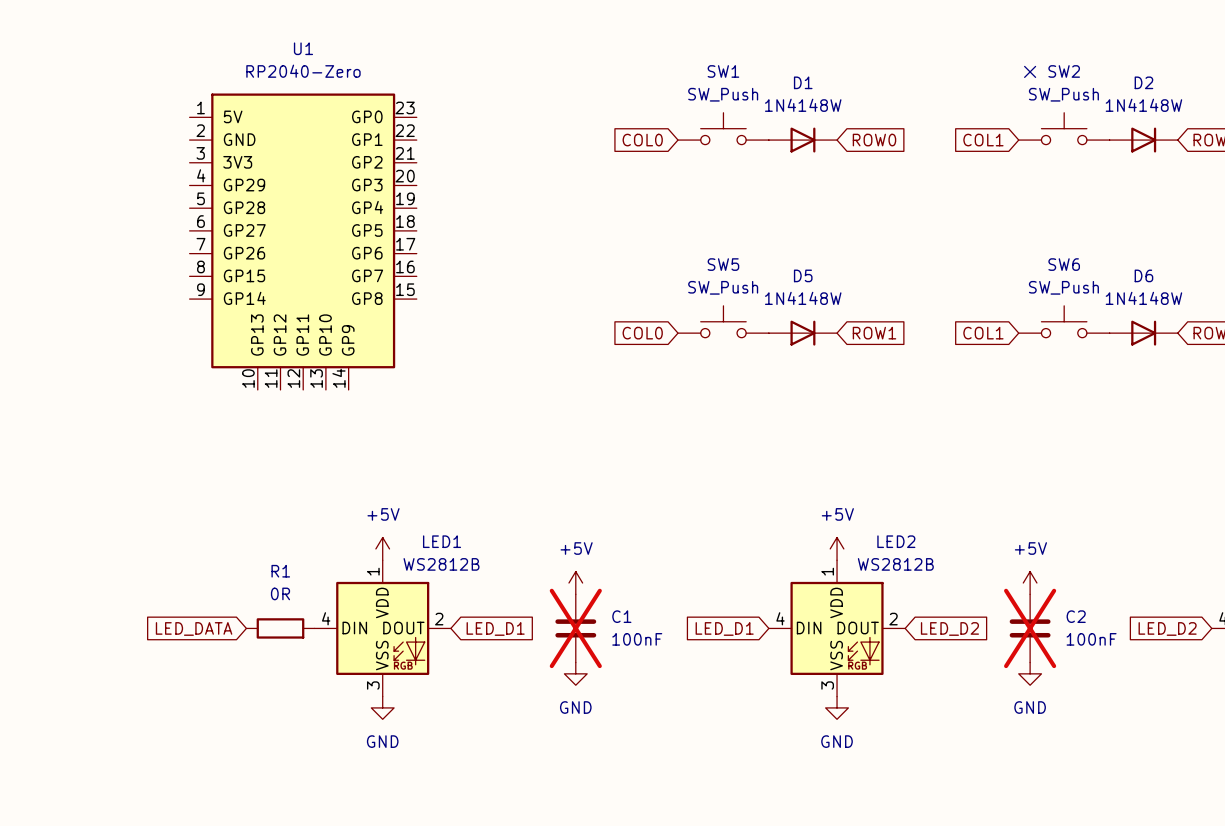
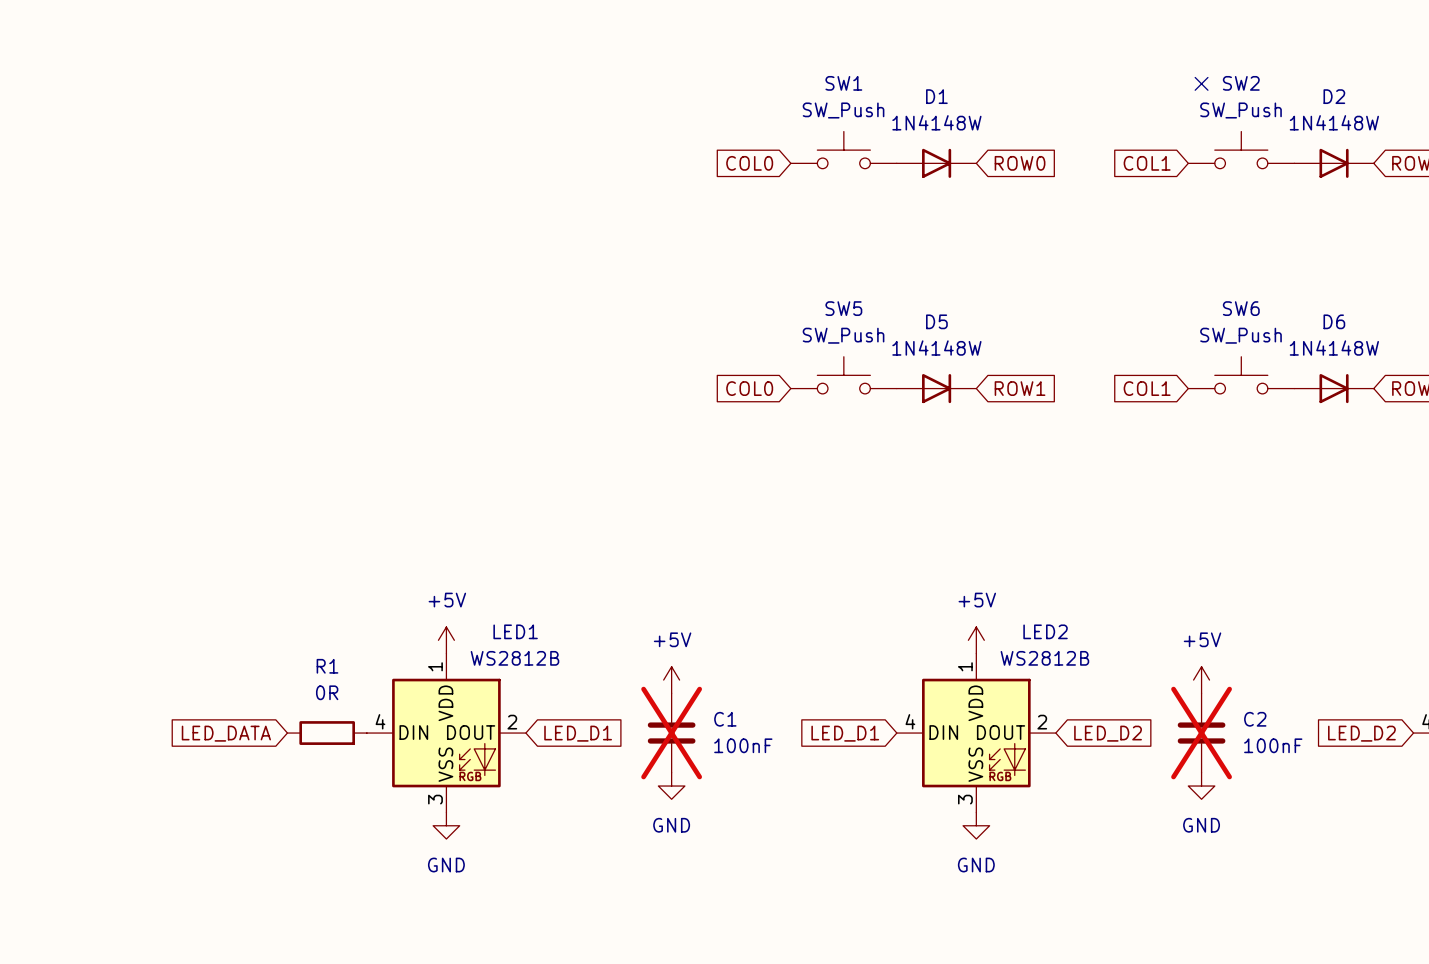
U1: RP2040-Zero (303, 241) -> none

